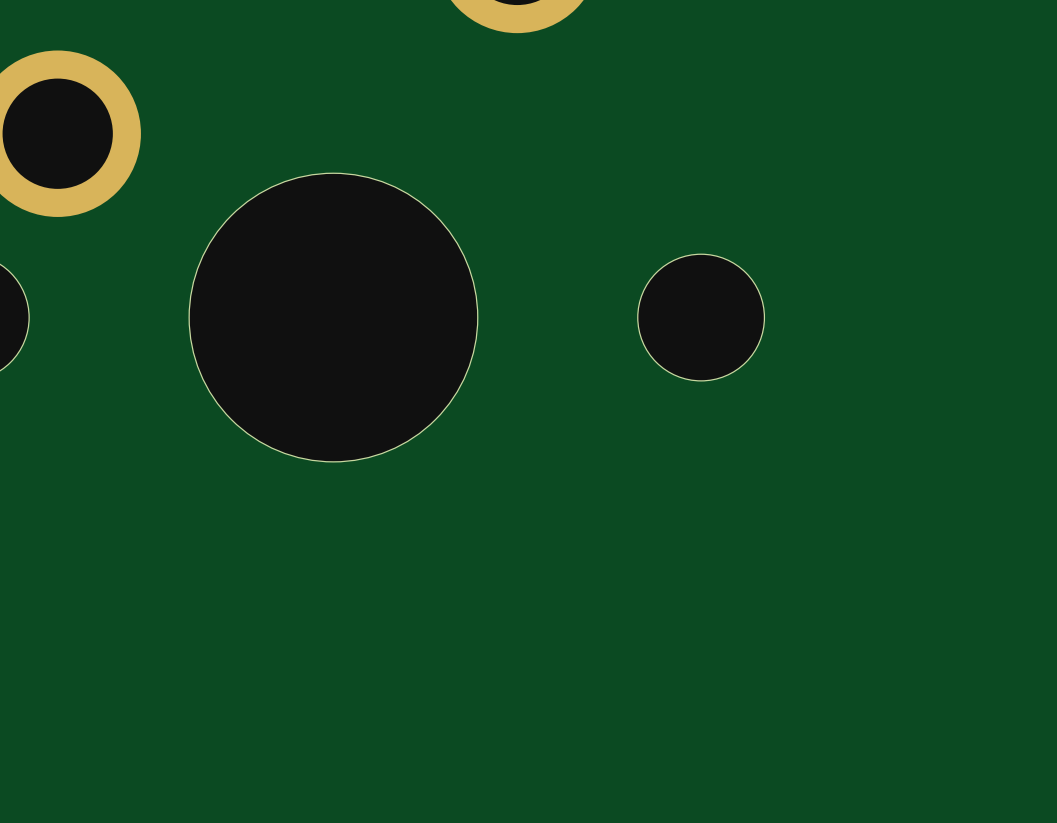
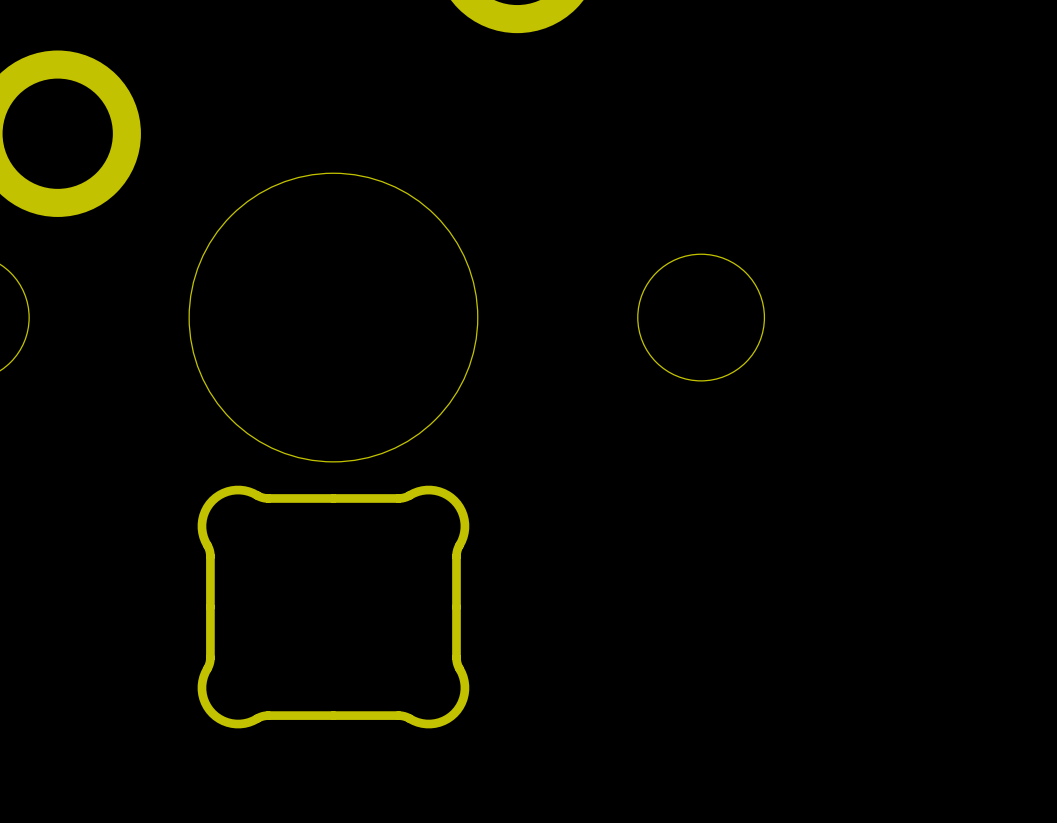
part: none -> (333, 607)

